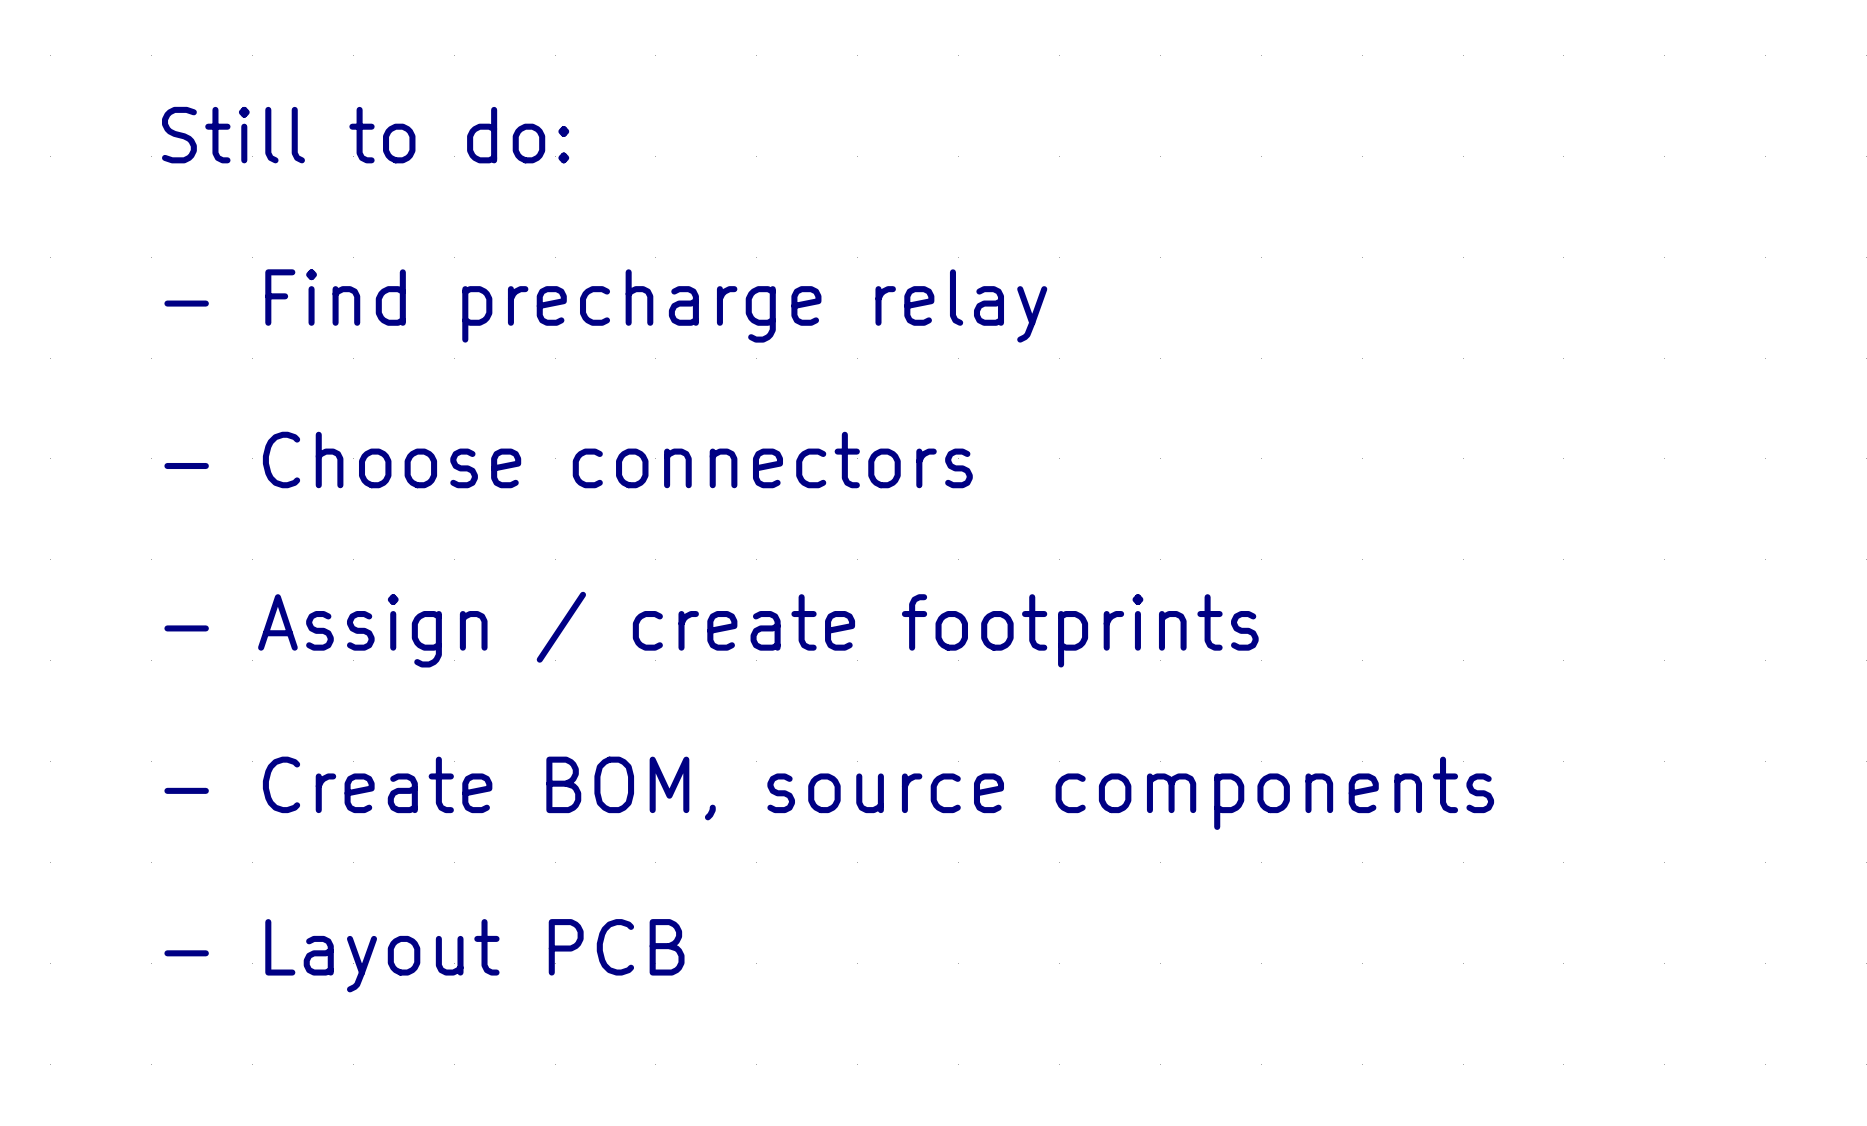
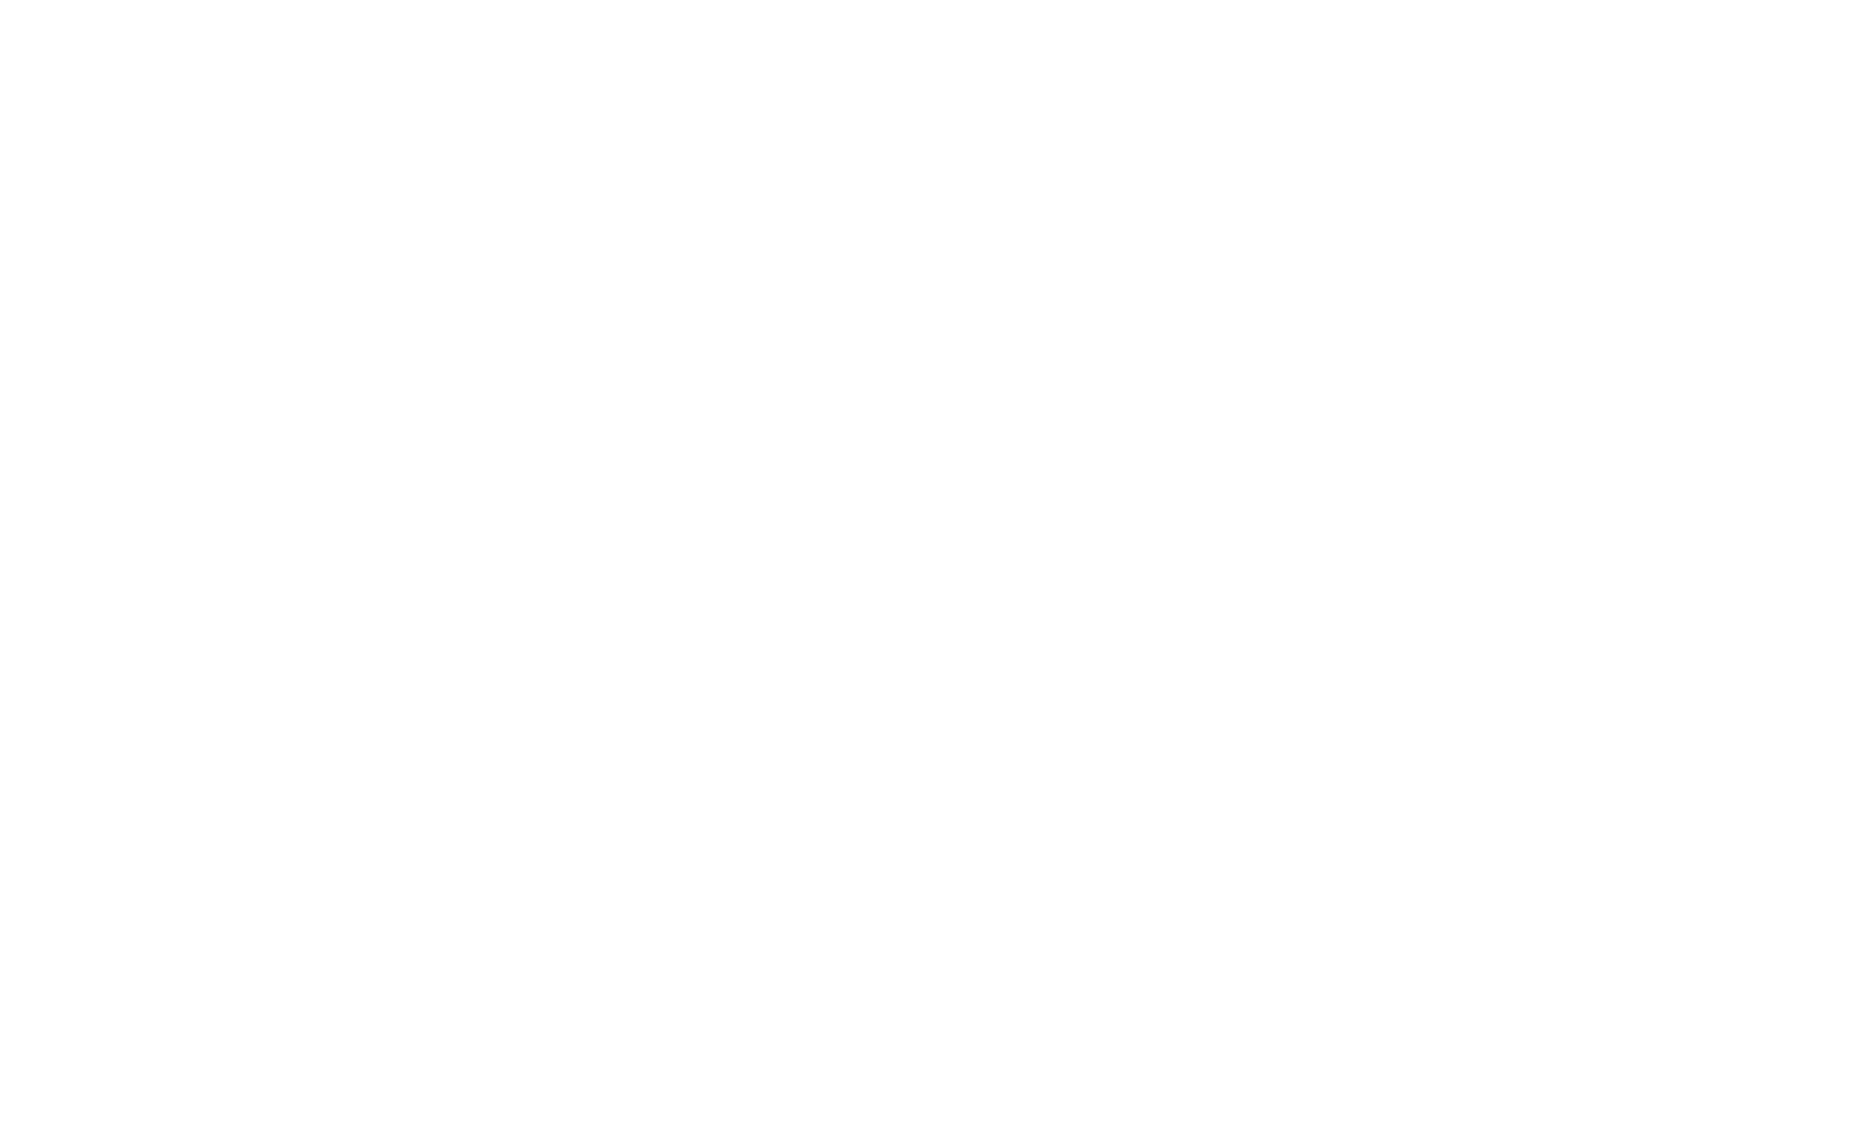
text: Still to do: (365, 135) -> none
text: - Find precharge relay (605, 305) -> none
text: - Choose connectors (568, 459) -> none
text: - Assign / create footprints (711, 629) -> none
text: - Create BOM, source components (829, 793) -> none
text: - Layout PCB (424, 955) -> none

